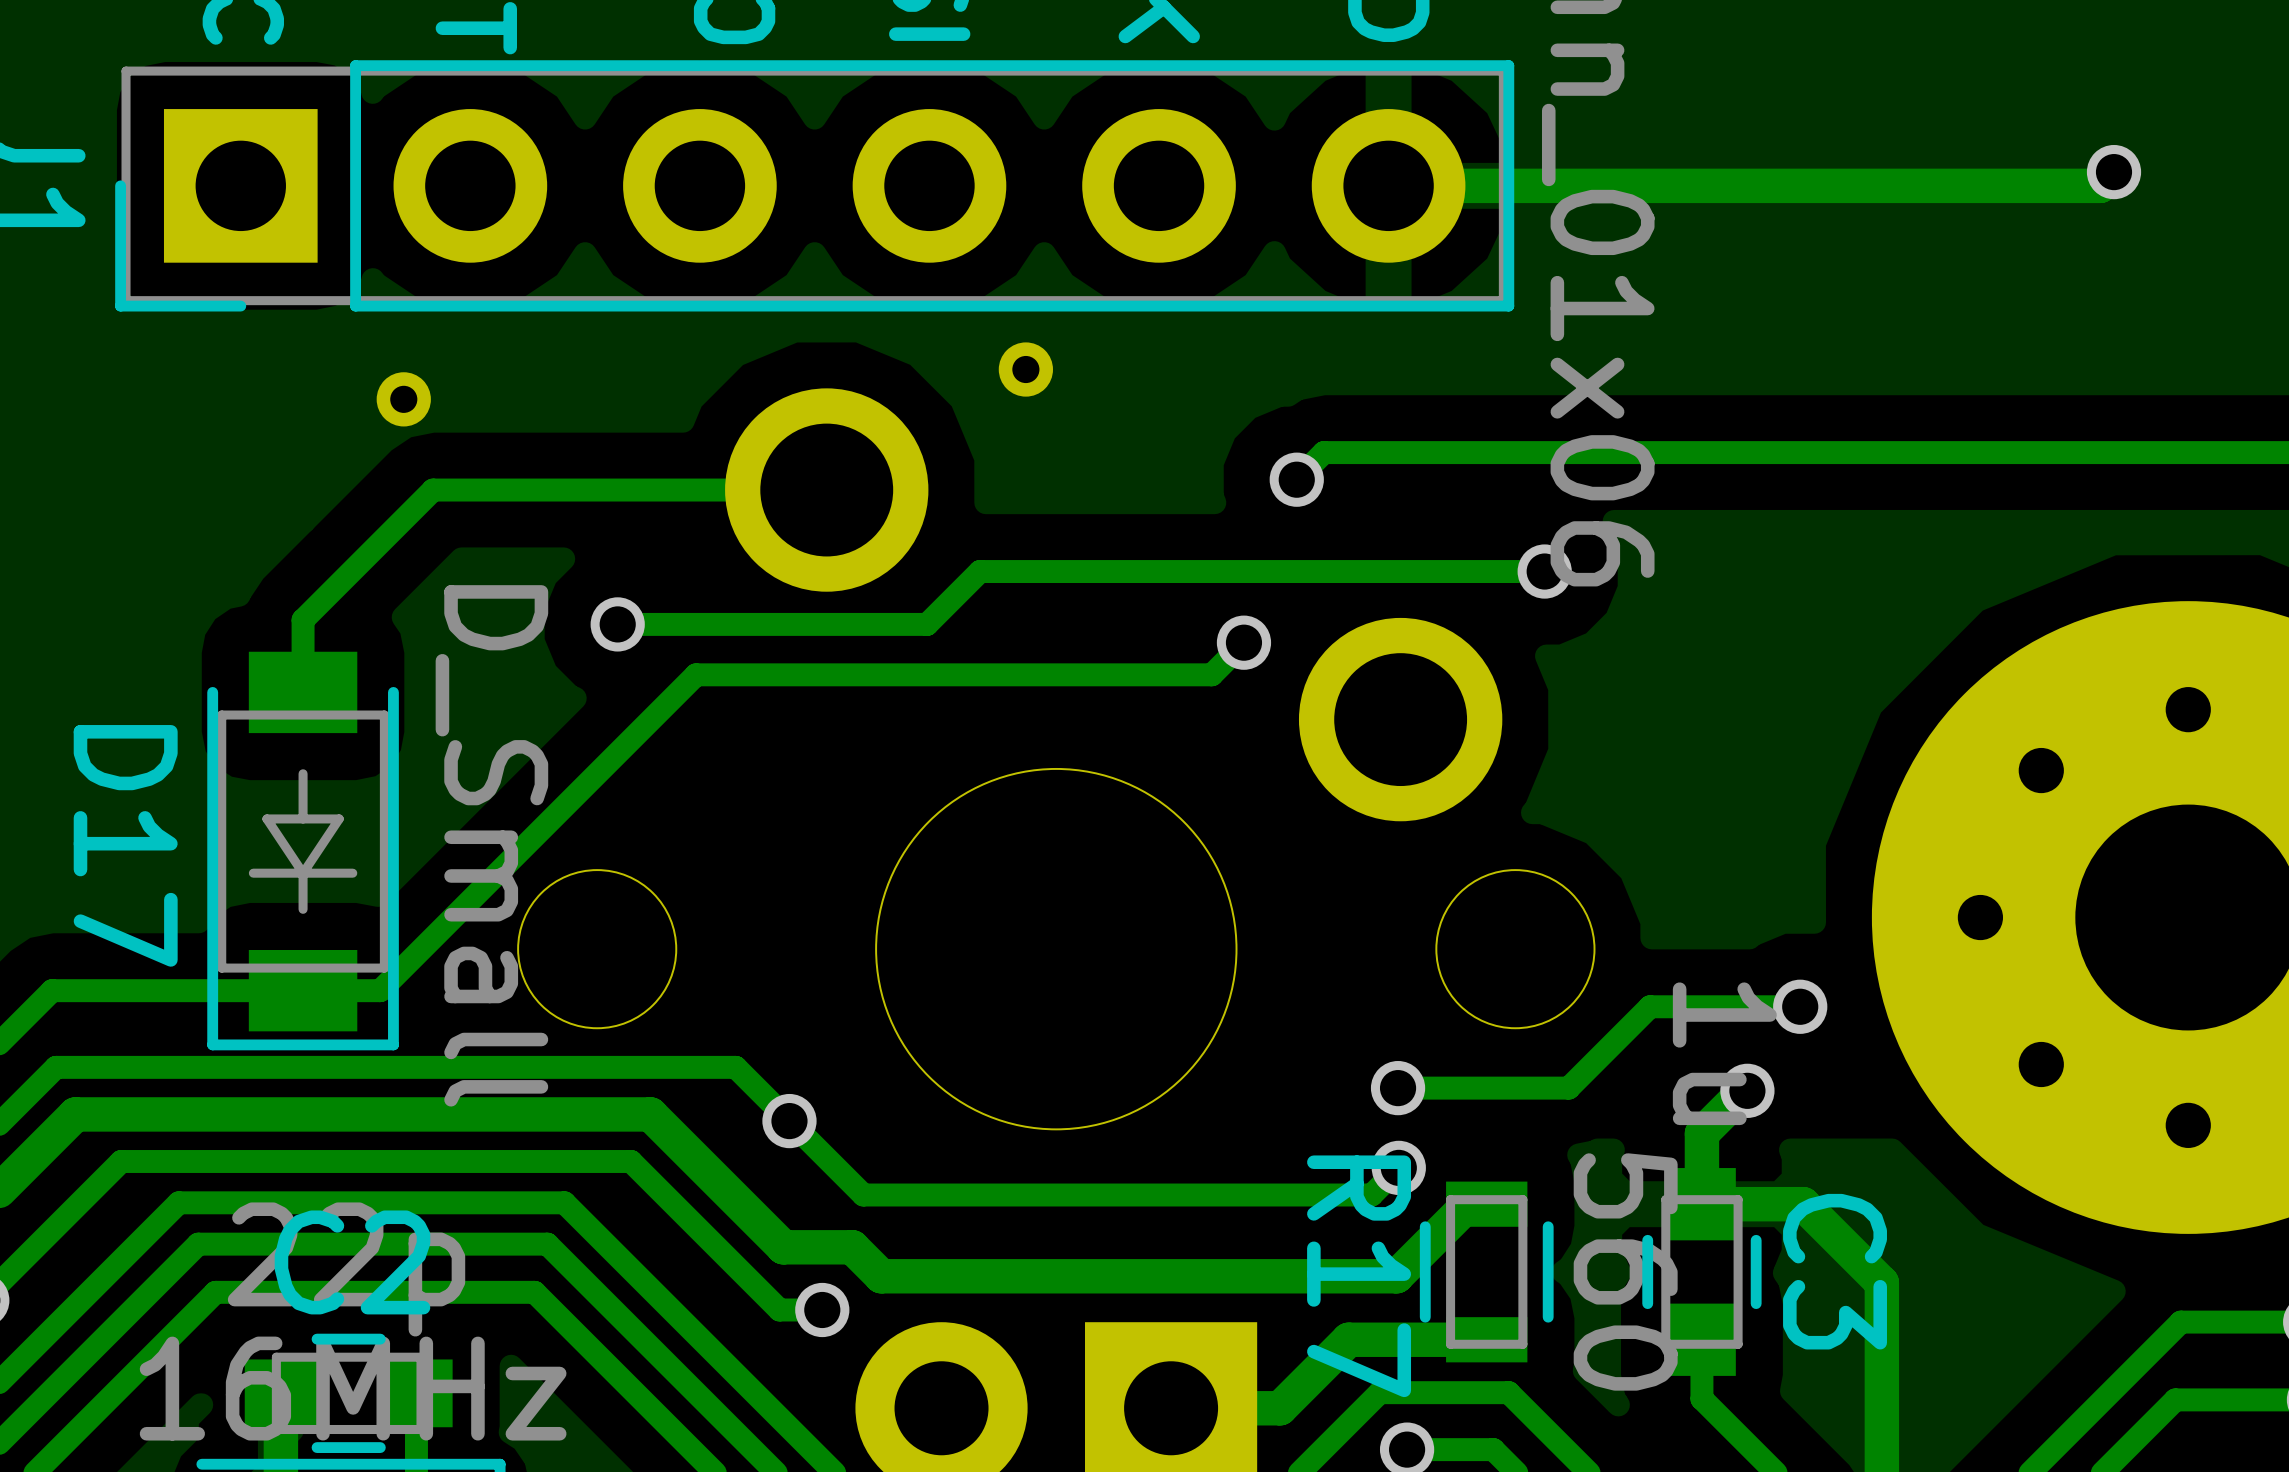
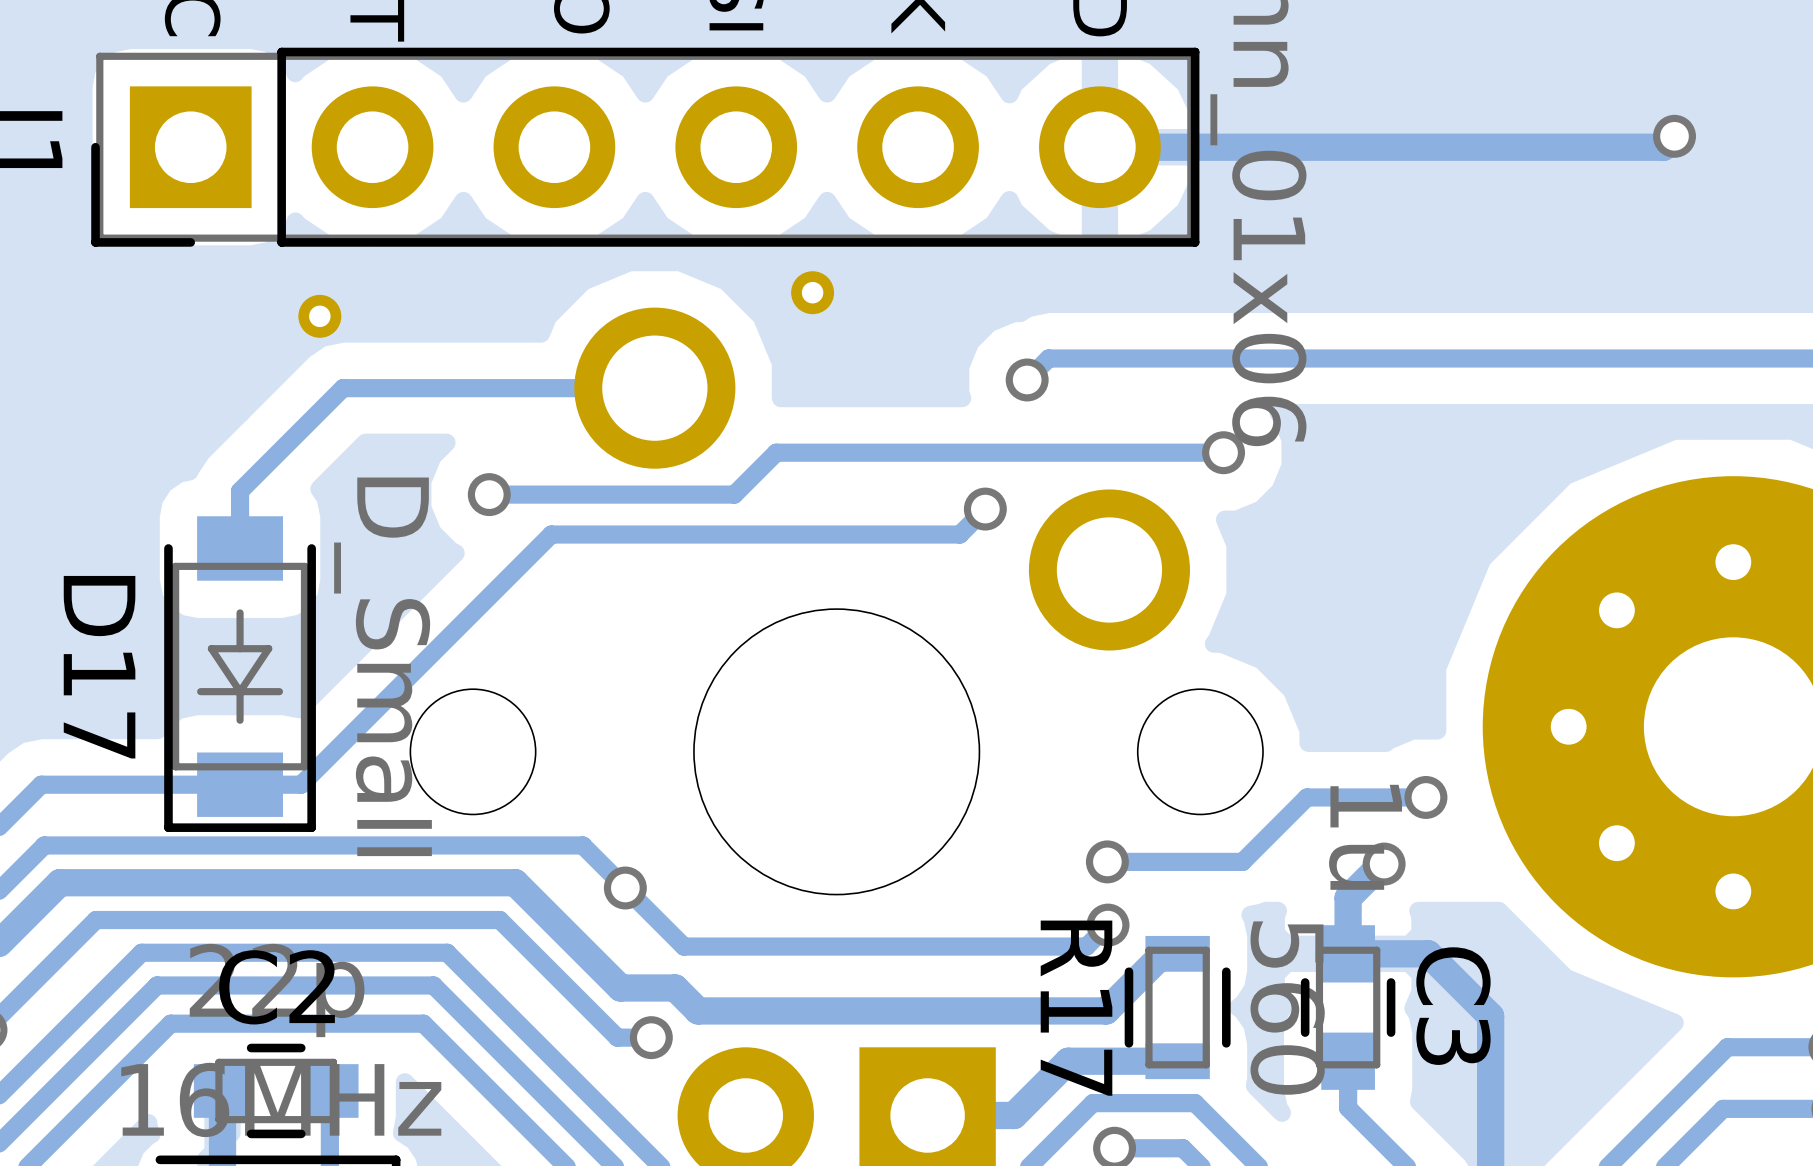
C2 position: (348, 1393) -> (276, 1090)

